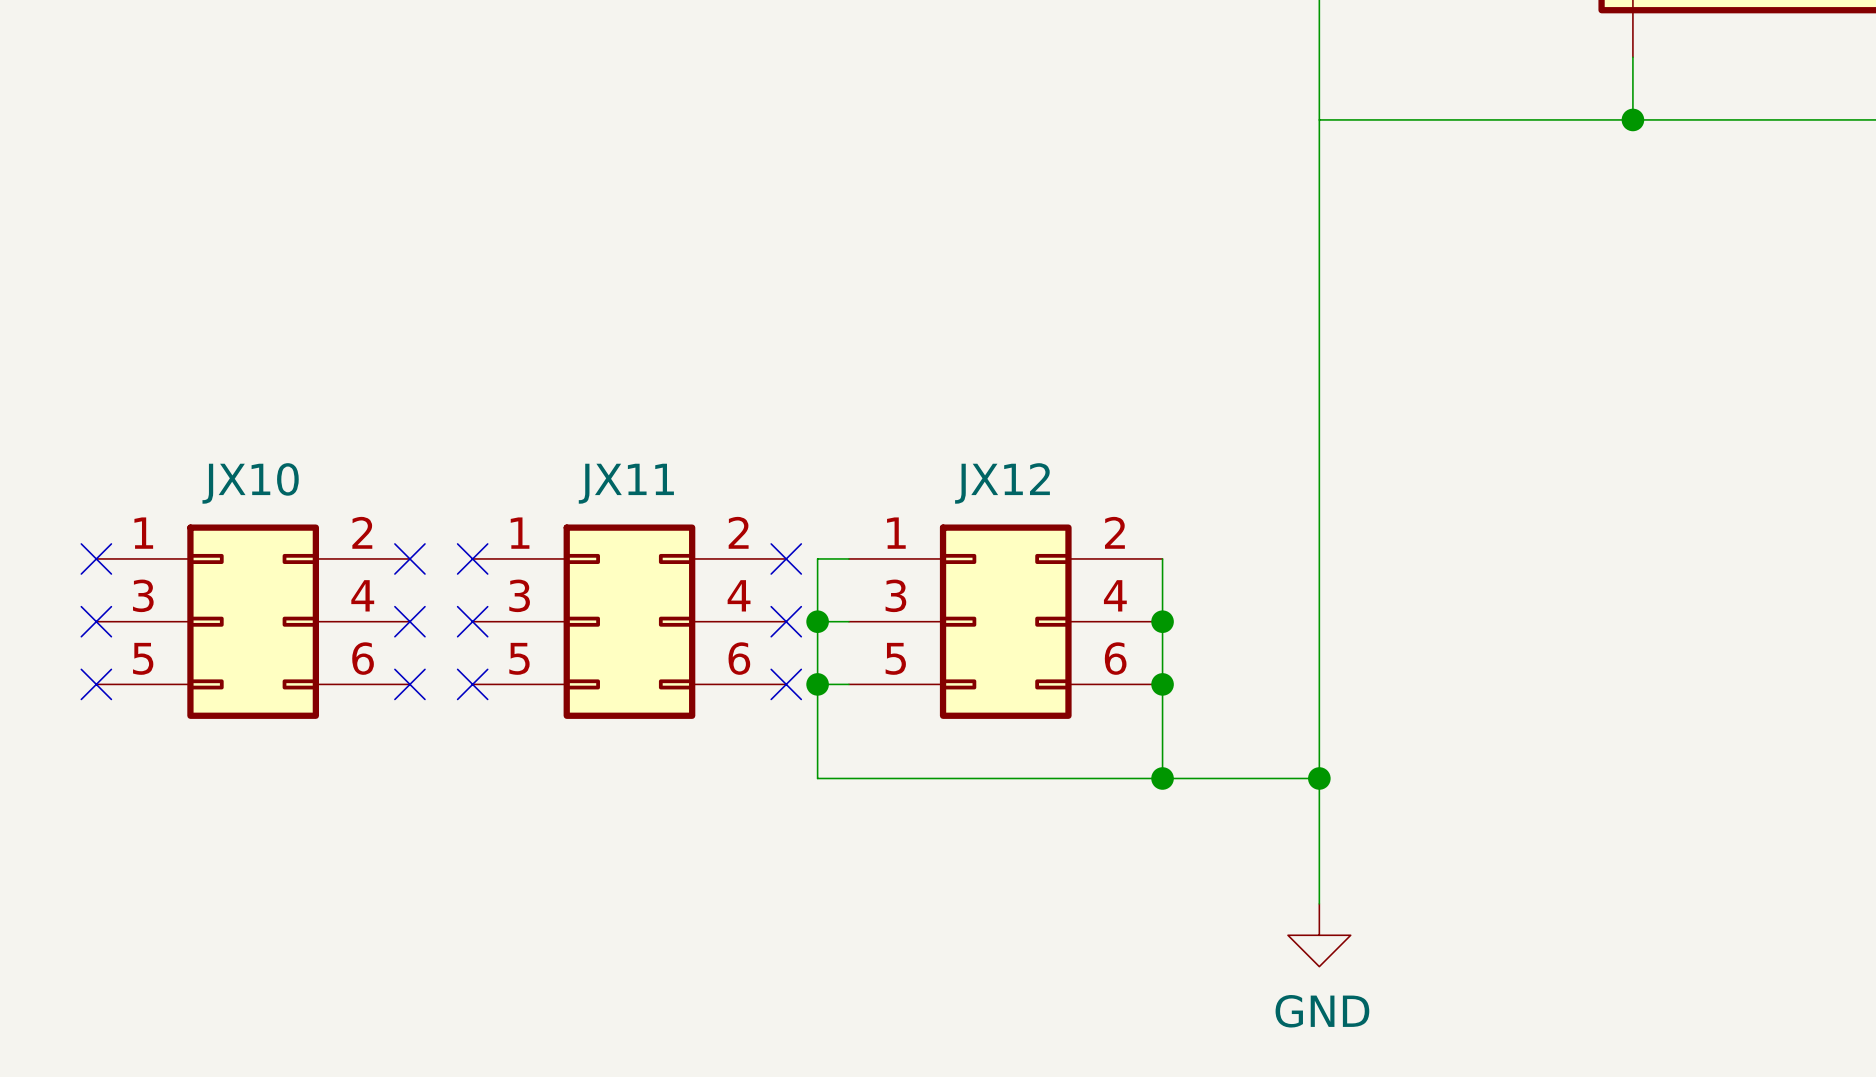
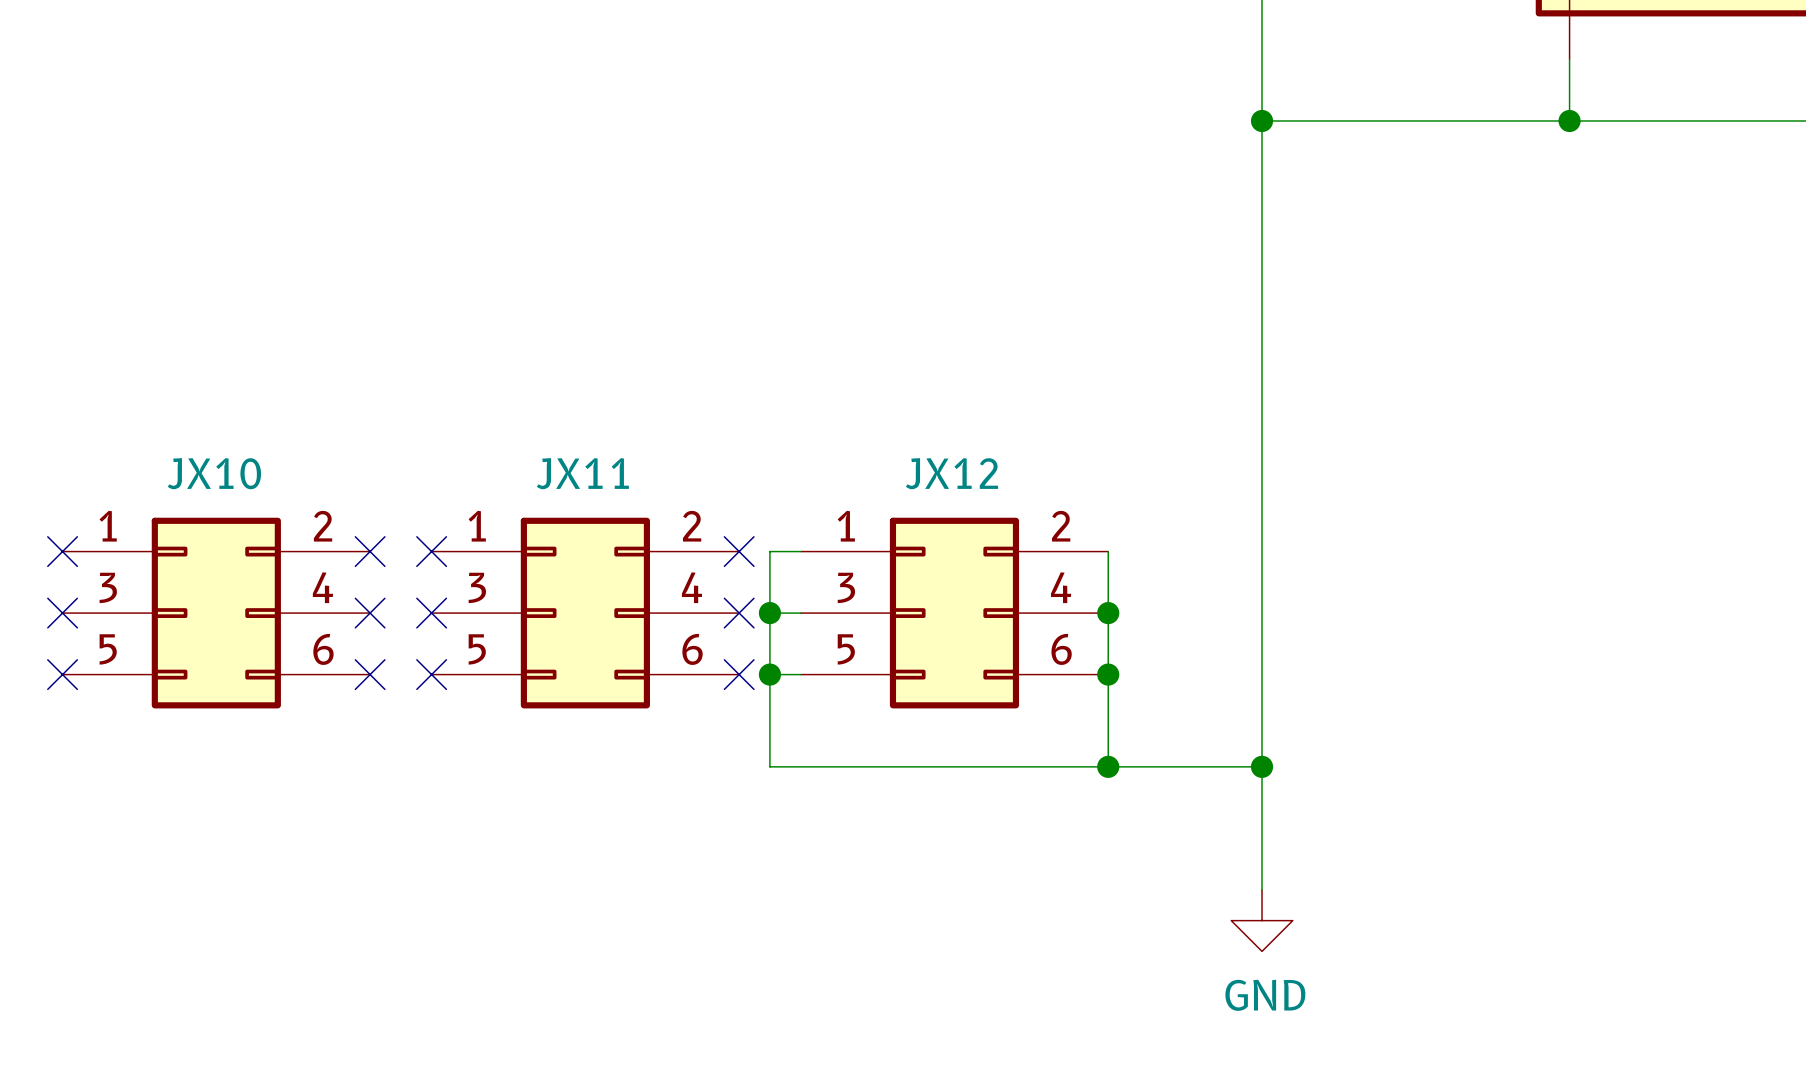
junction: none -> (1262, 121)

